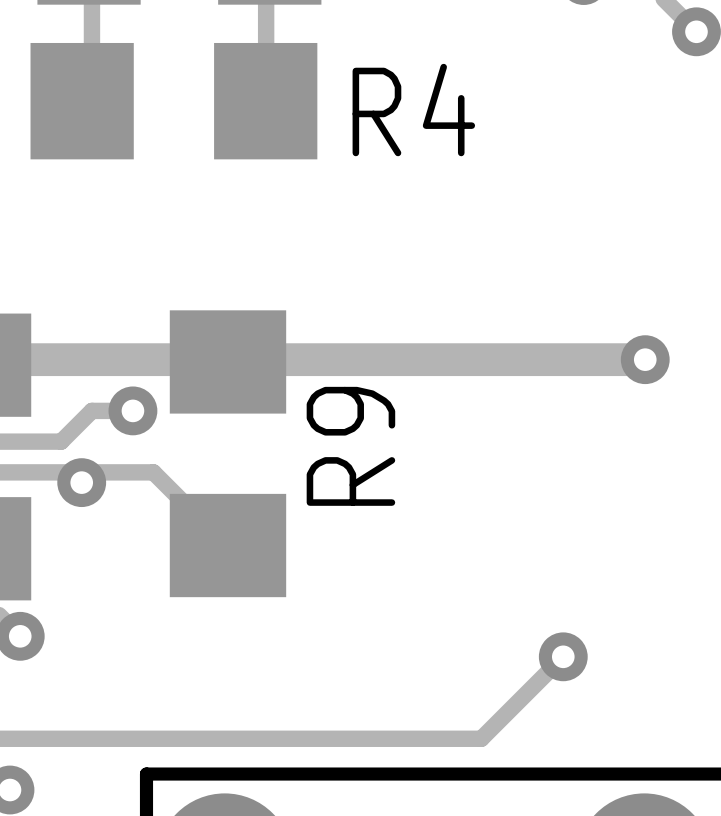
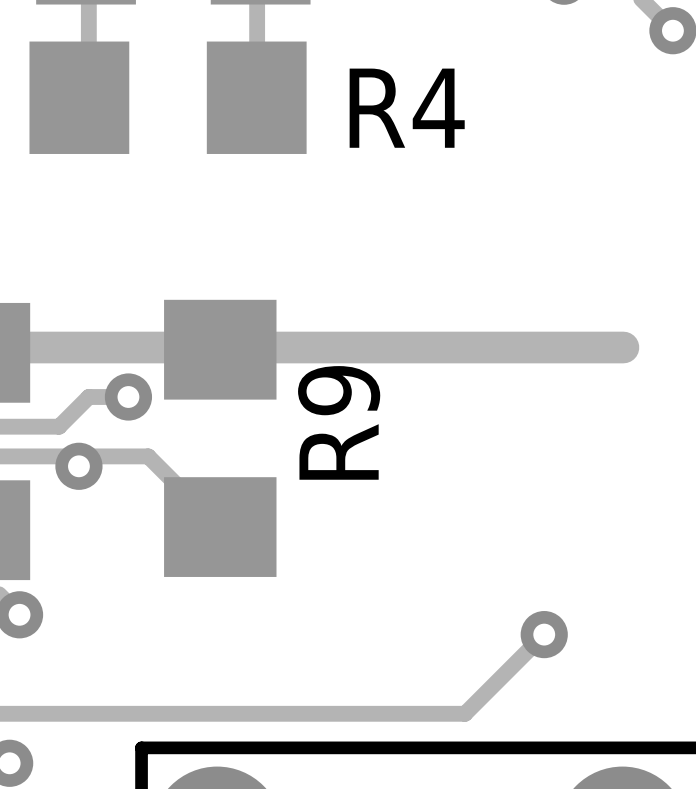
via: (645, 359) -> none

